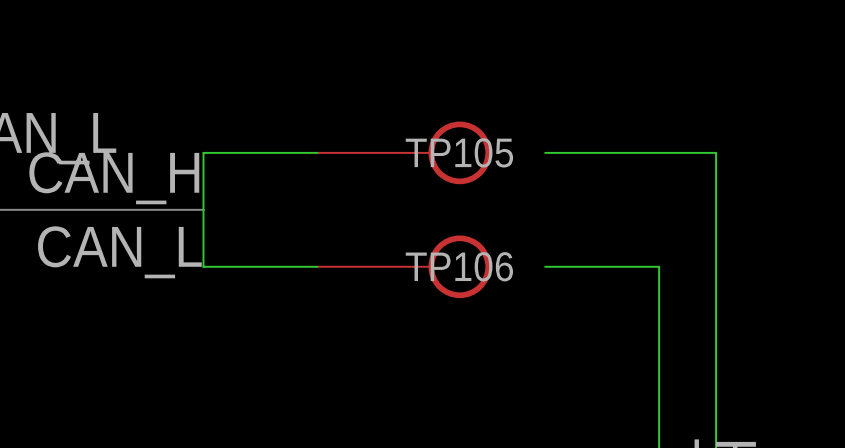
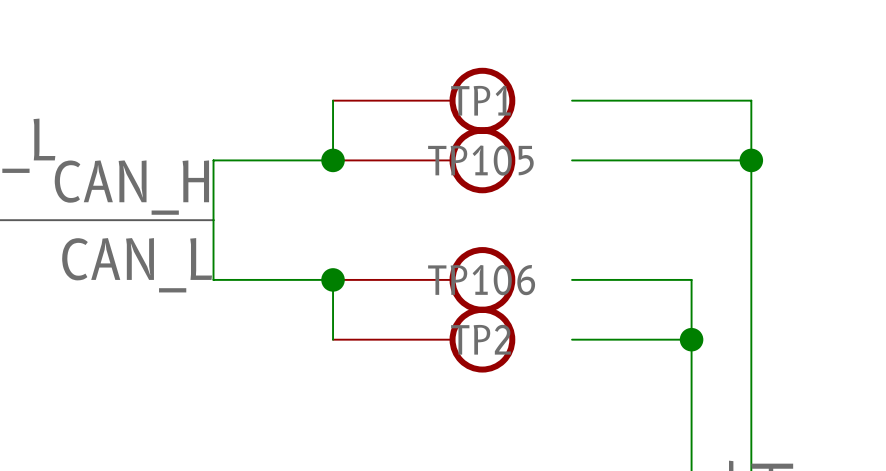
wire: none -> (333, 100) (333, 160)
TP1: none -> (424, 100)
wire: none -> (572, 100) (751, 100) (751, 160)
junction: none -> (333, 160)
junction: none -> (751, 160)
wire: none -> (333, 279) (333, 339)
junction: none -> (333, 279)
TP2: none -> (424, 339)
wire: none -> (572, 339) (691, 339)
junction: none -> (691, 339)

